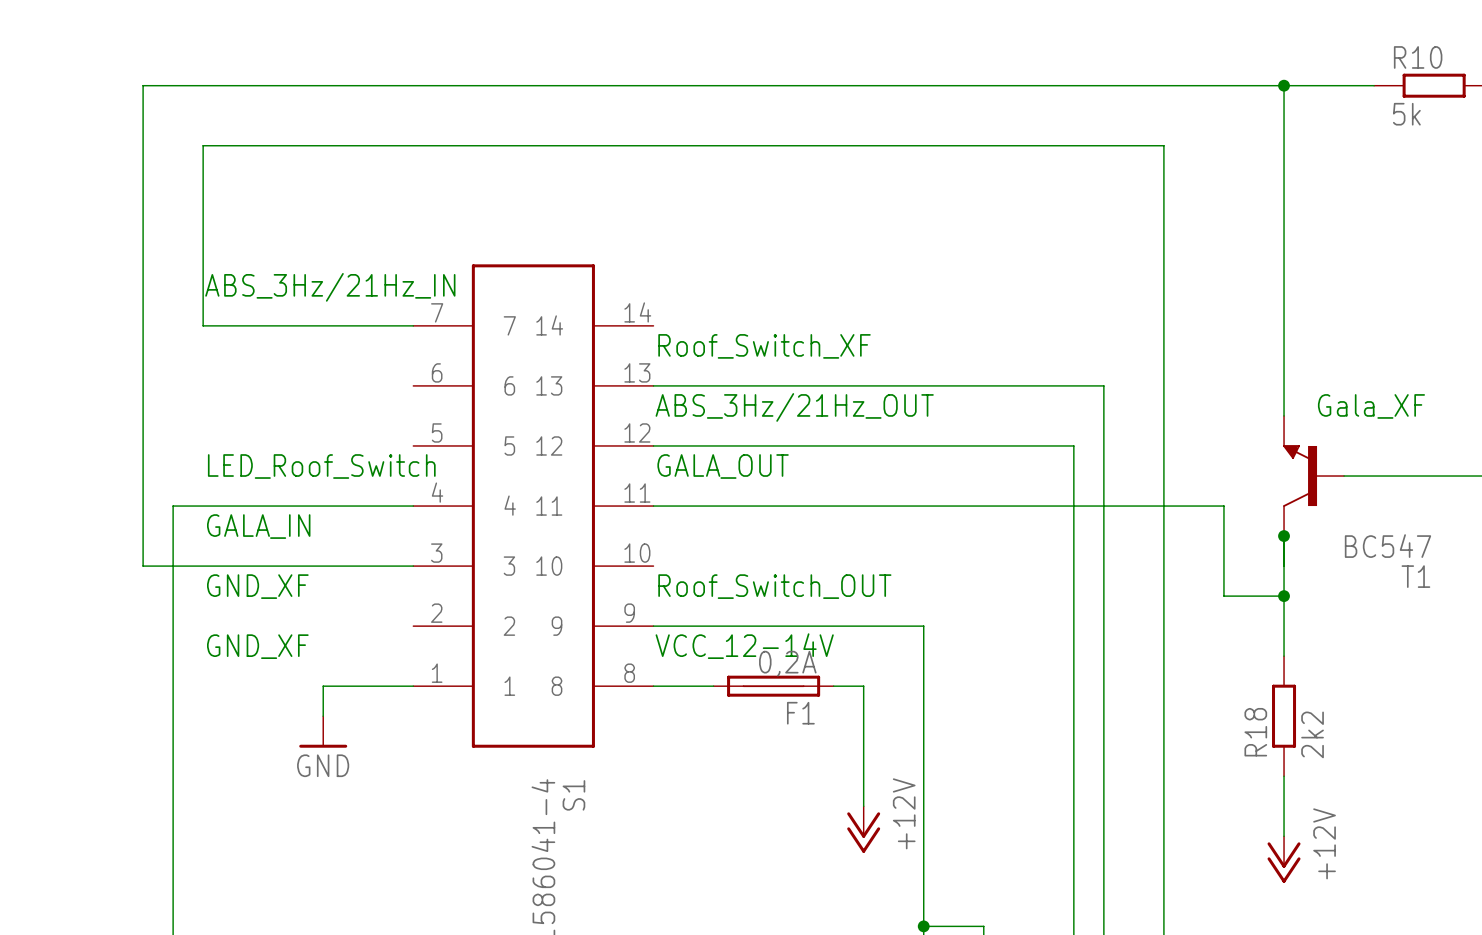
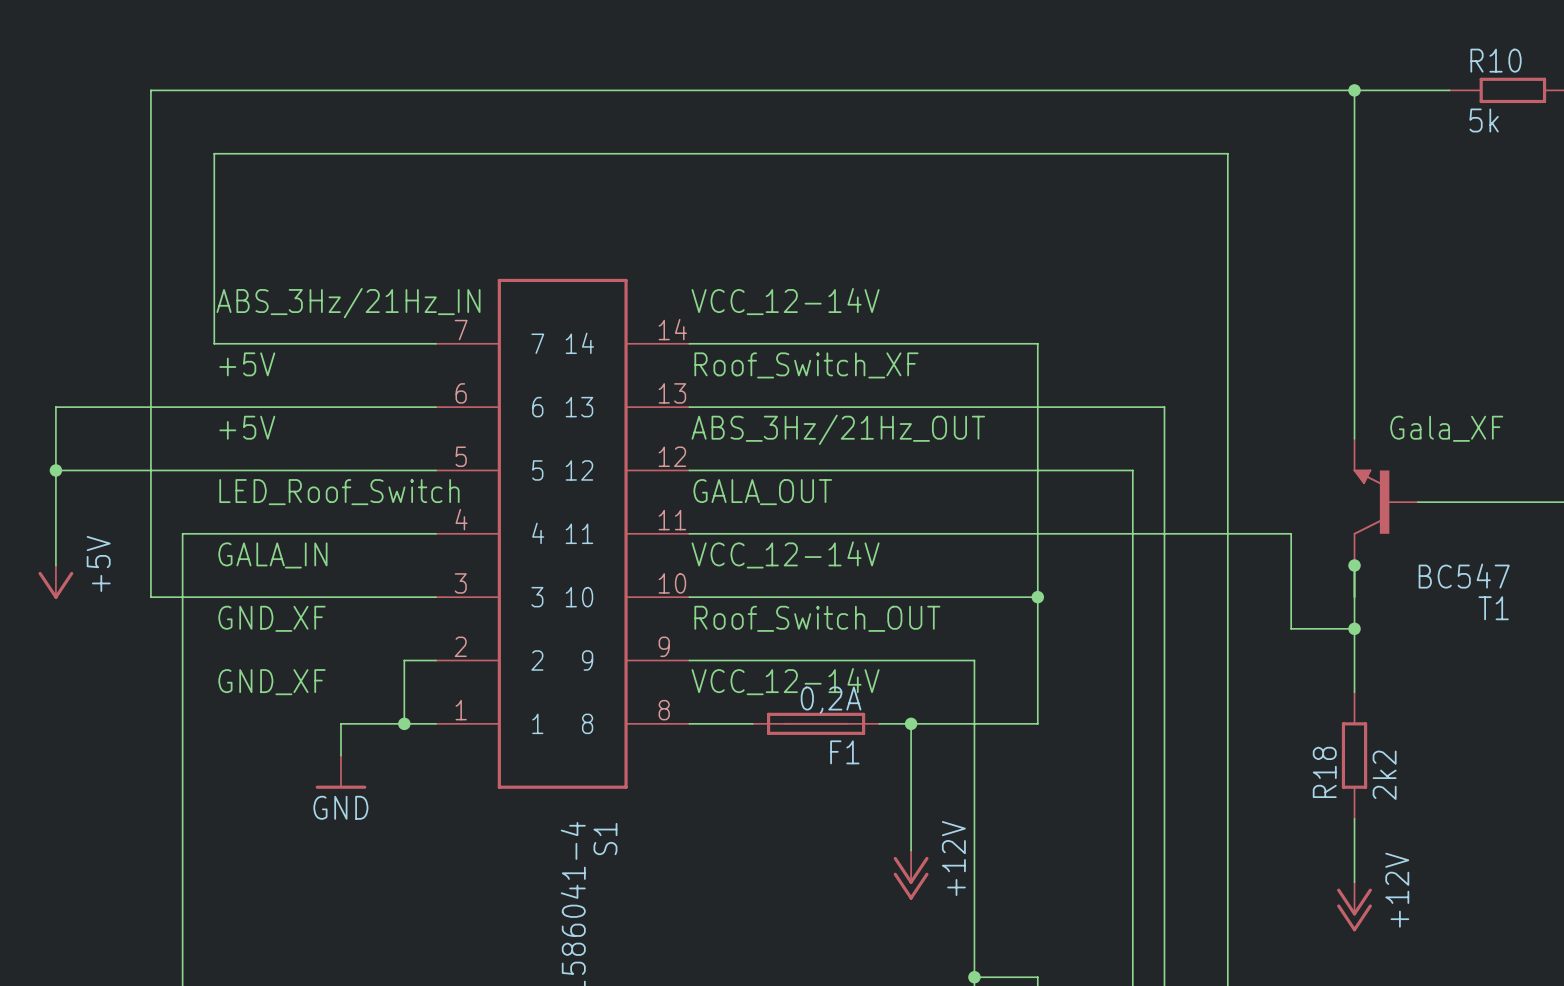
text: none -> VCC_12-14V (785, 301)
wire: none -> (689, 343) (1037, 343) (1037, 723) (911, 723)
text: none -> +5V (247, 364)
wire: none -> (436, 407) (55, 407) (55, 565)
text: none -> +5V (247, 427)
wire: none -> (55, 470) (436, 470)
junction: none -> (55, 470)
text: none -> VCC_12-14V (785, 554)
power symbol: none -> +5V (55, 582)
wire: none -> (689, 597) (1037, 597)
junction: none -> (1037, 597)
wire: none -> (436, 660) (404, 660) (404, 723)
junction: none -> (404, 723)
junction: none -> (911, 723)

